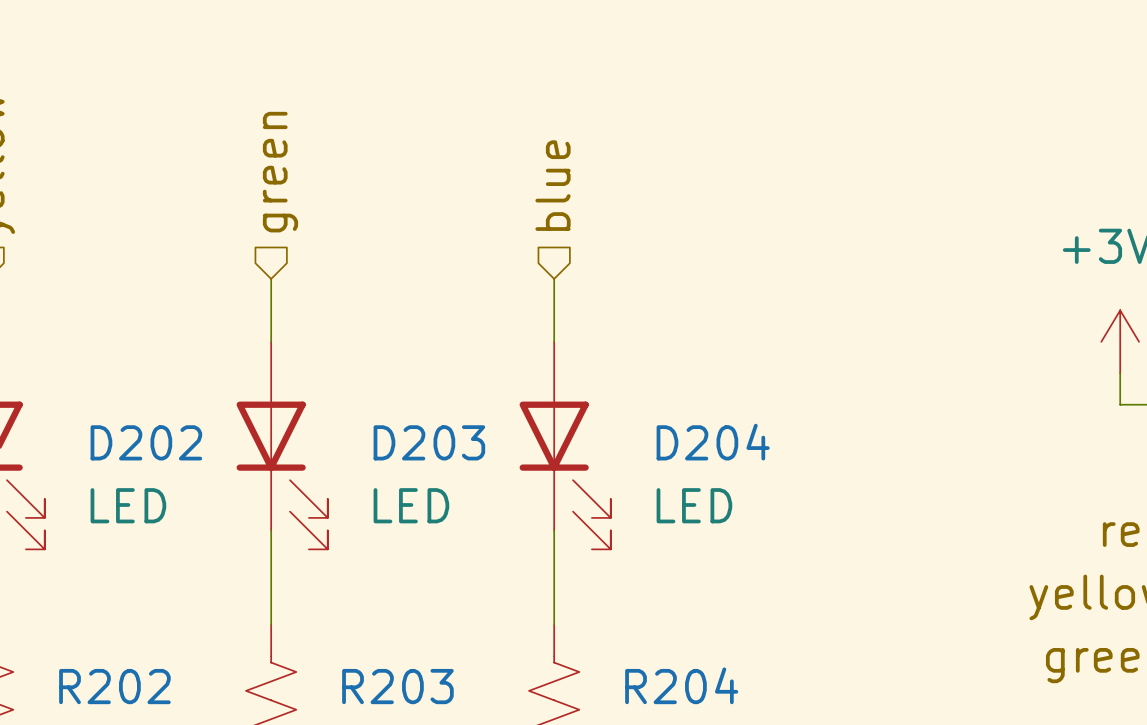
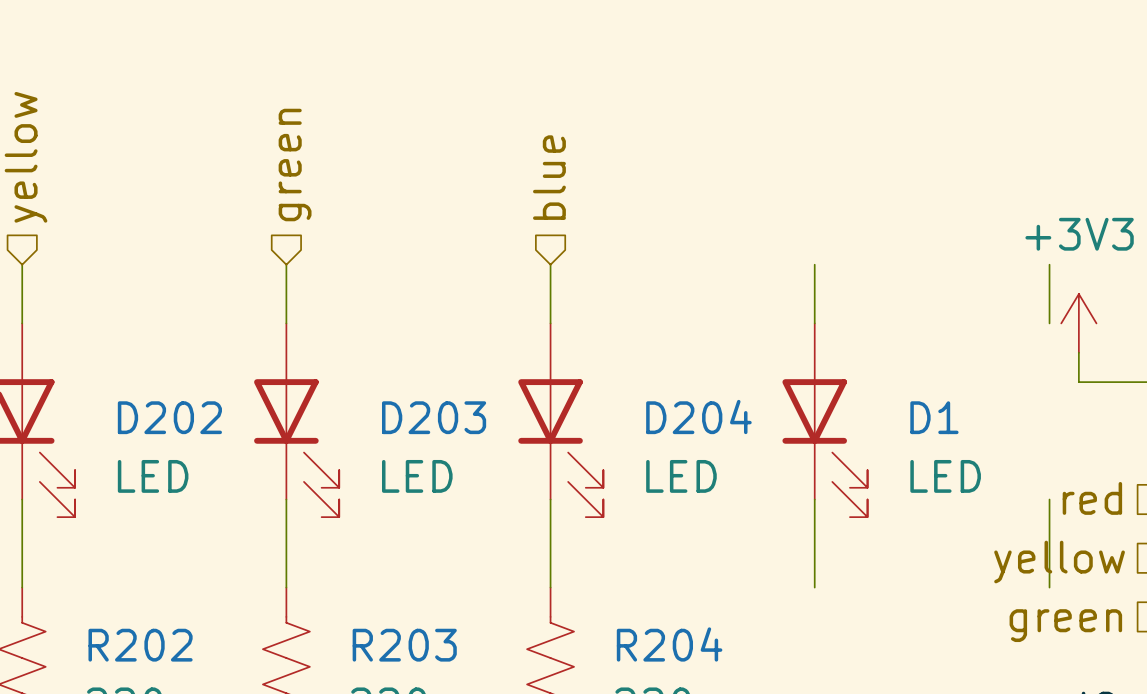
wire: none -> (814, 264) (814, 323)
wire: none -> (1049, 264) (1049, 323)
D1: none -> LED (824, 420)
wire: none -> (814, 499) (814, 587)
wire: none -> (1049, 499) (1049, 587)

